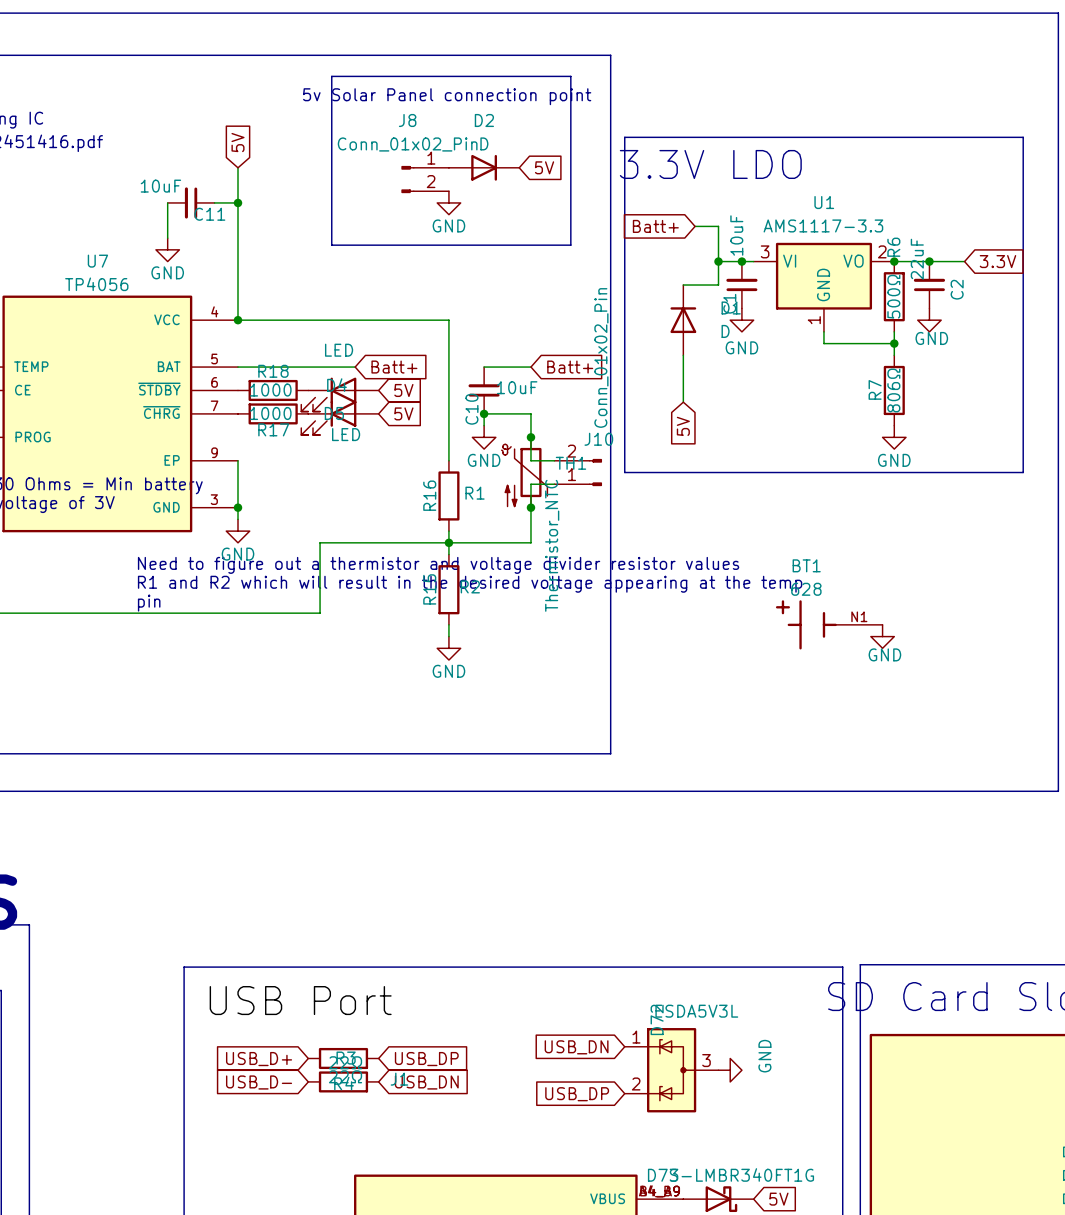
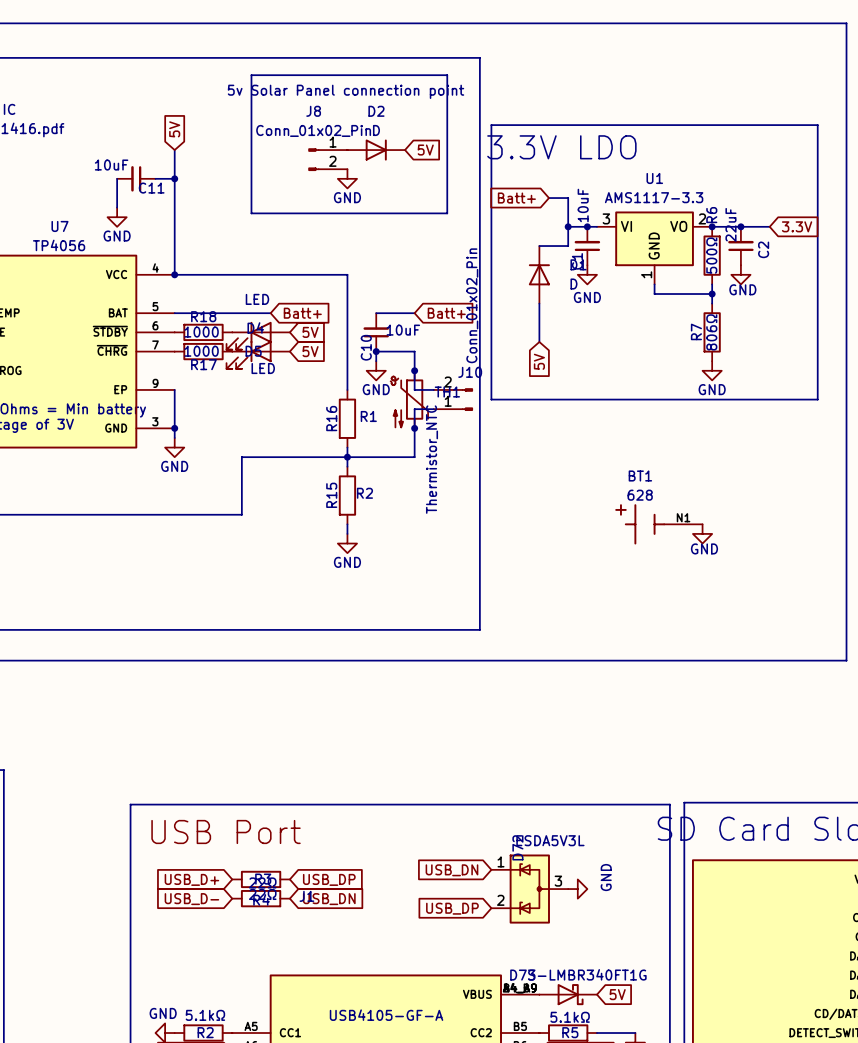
text: Need to figure out a thermistor and voltage divider resistor values (438, 565) -> none
text: R1 and R2 which will result in the desired voltage appearing at the temp (470, 584) -> none
text: pin (149, 603) -> none

